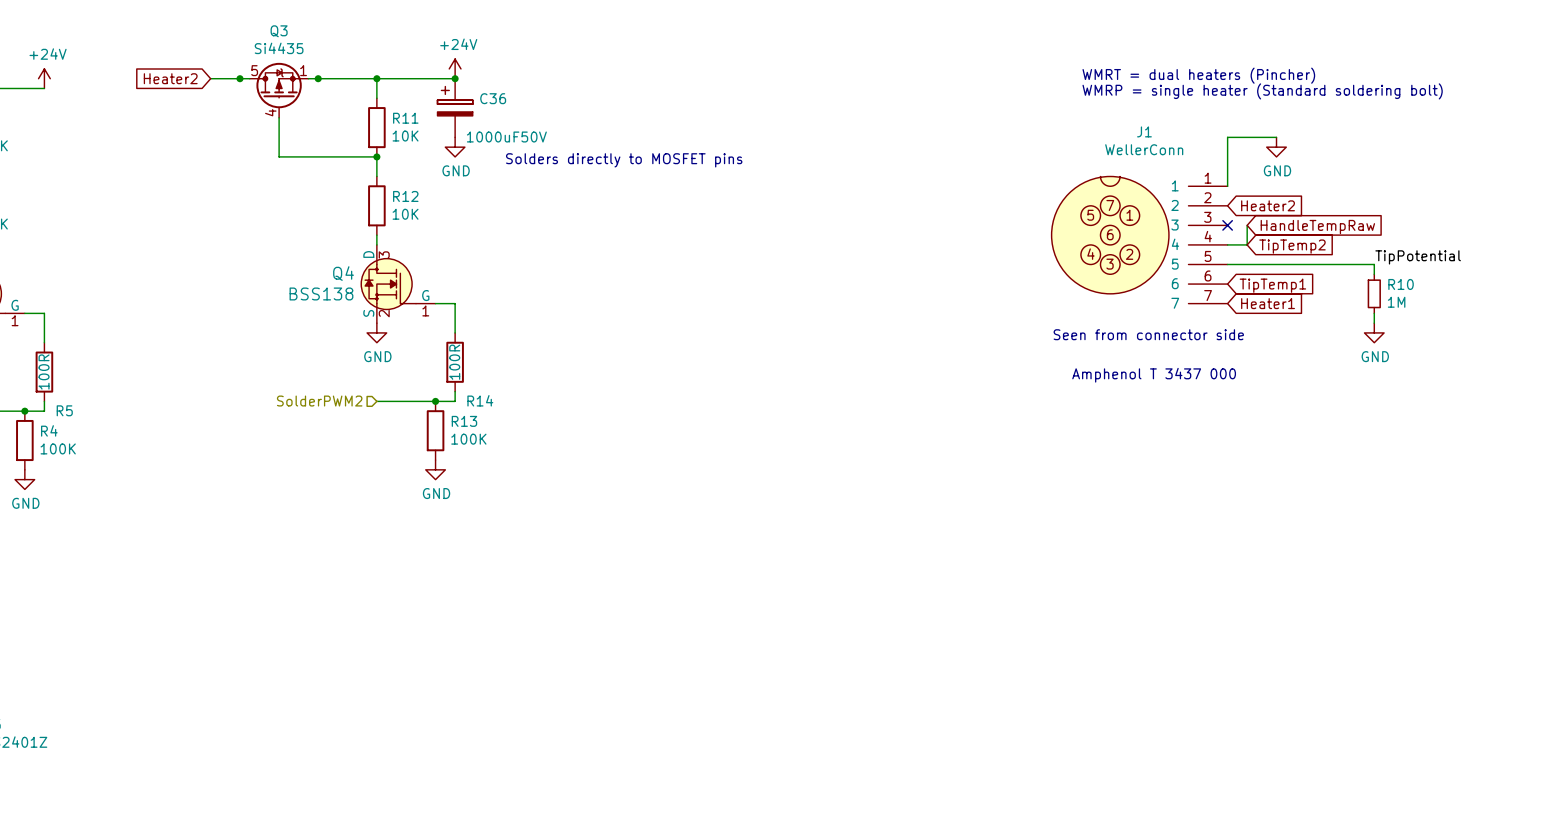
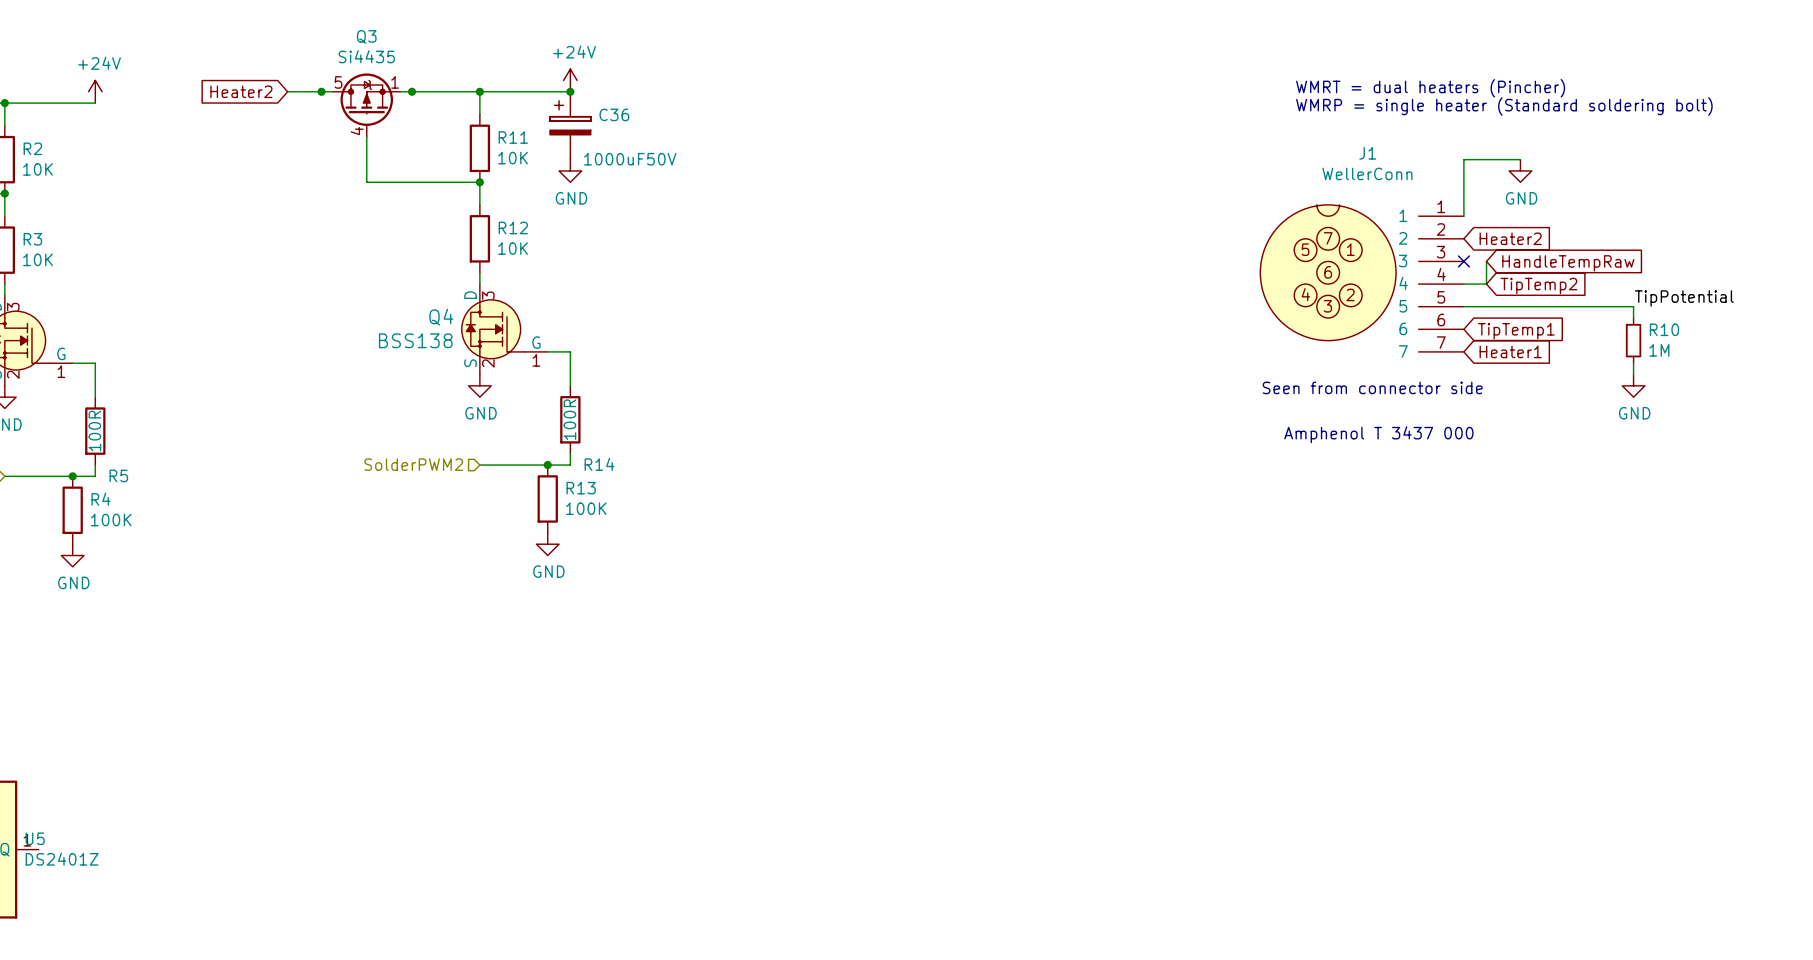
text: Solders directly to MOSFET pins (624, 160) -> none

